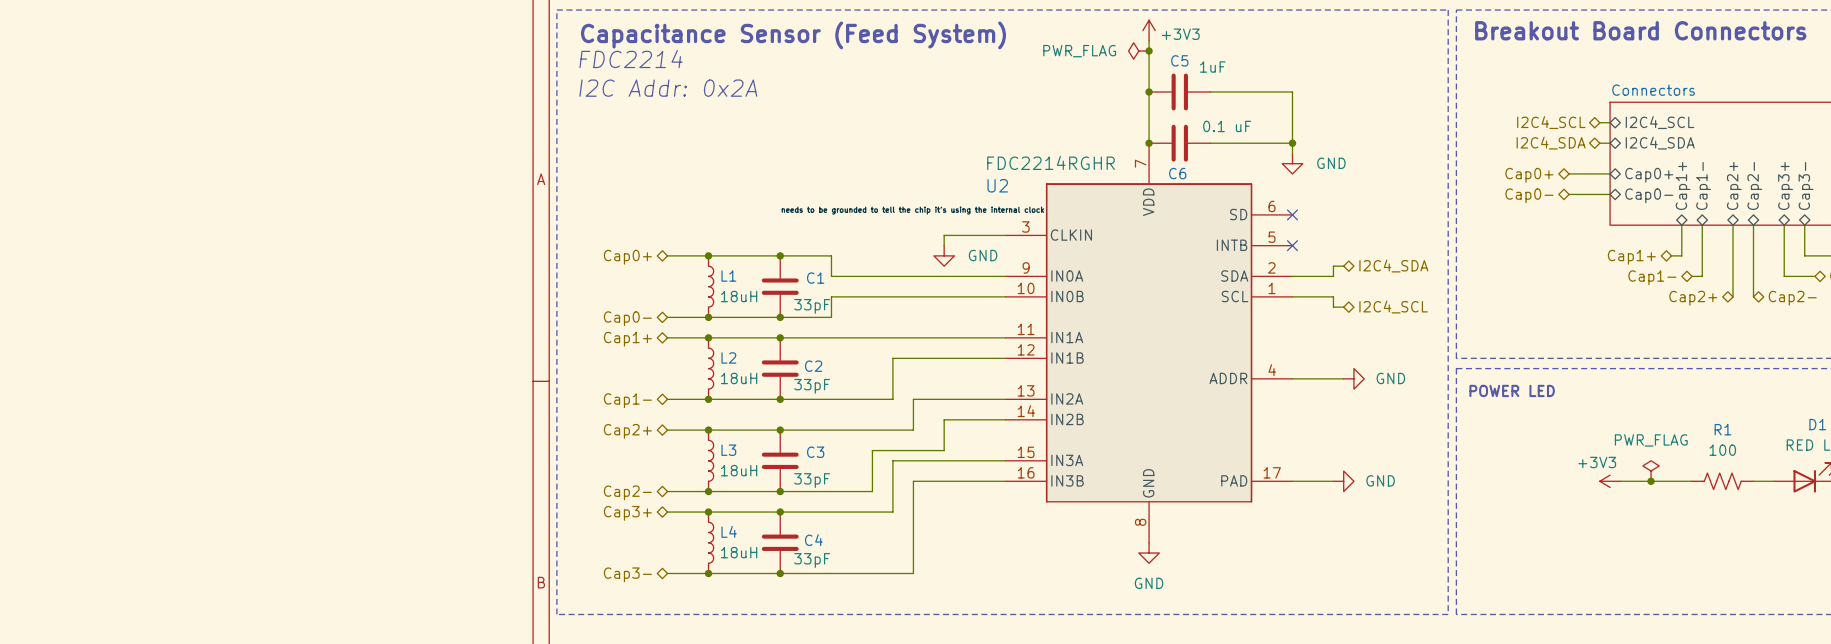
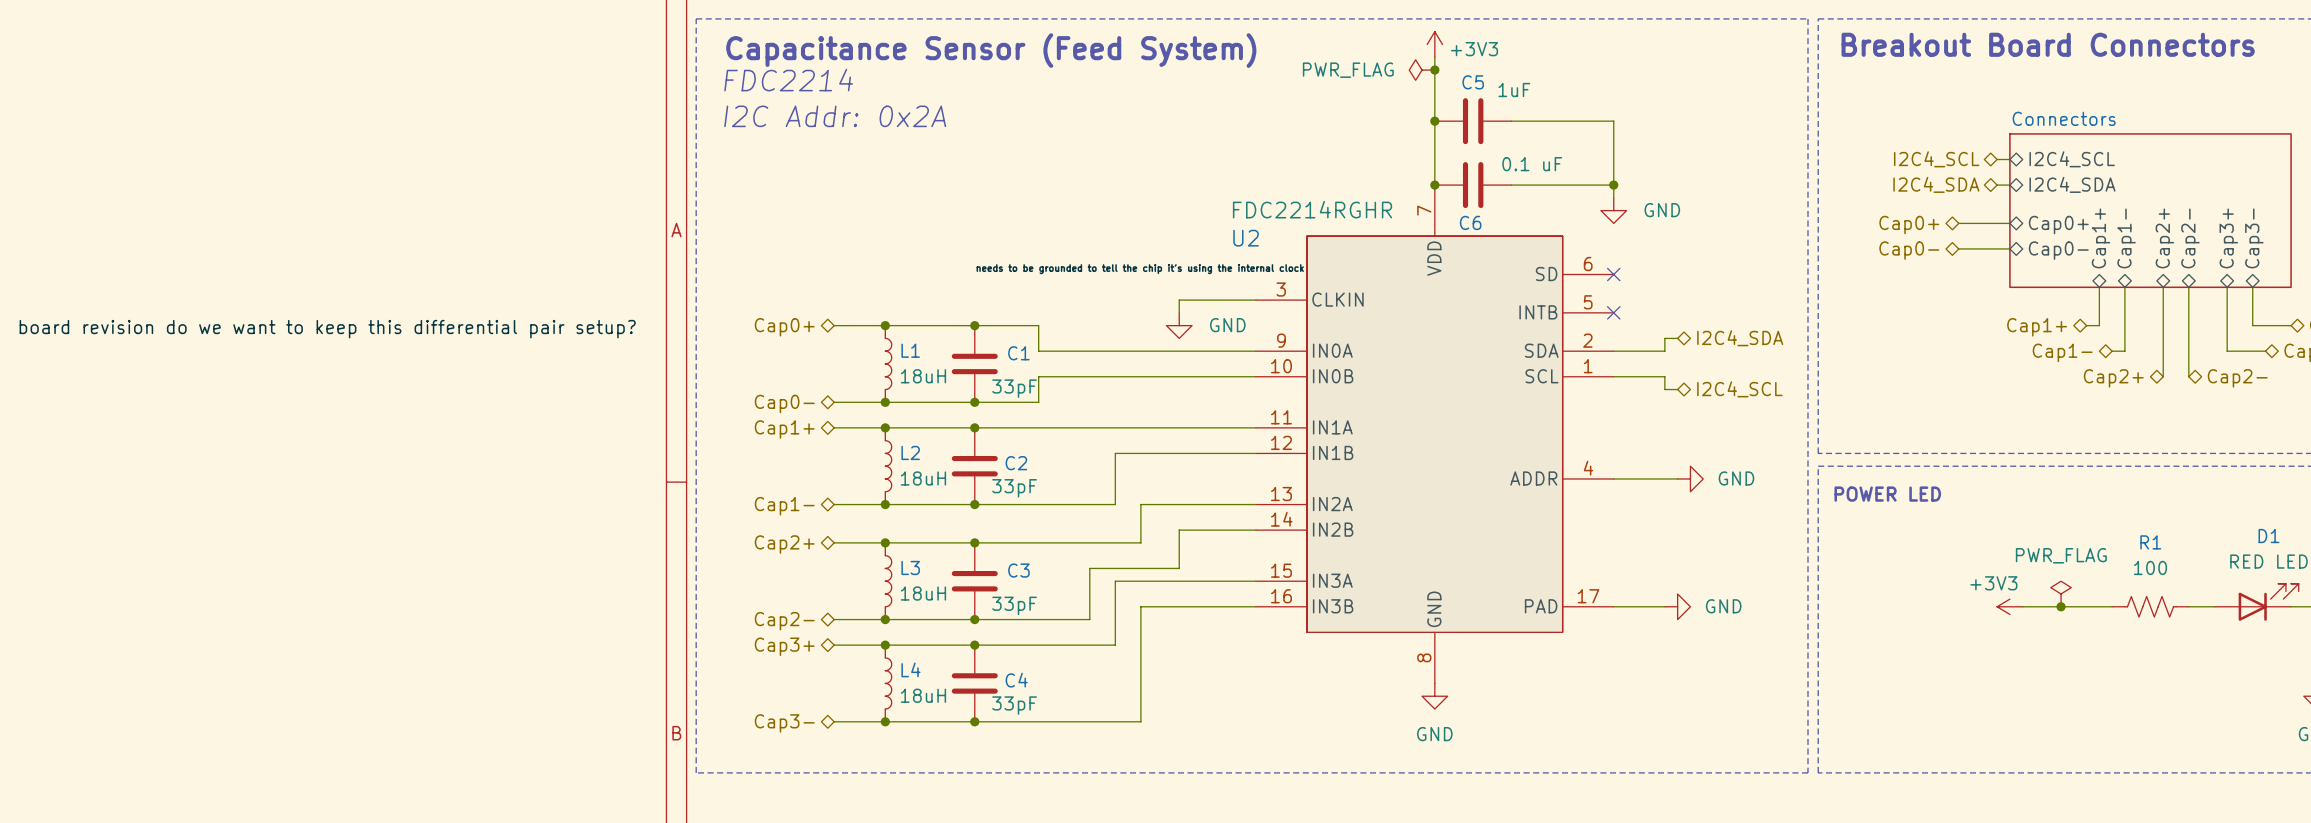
label: none -> board revision do we want to keep this differential pair setup? (327, 329)

